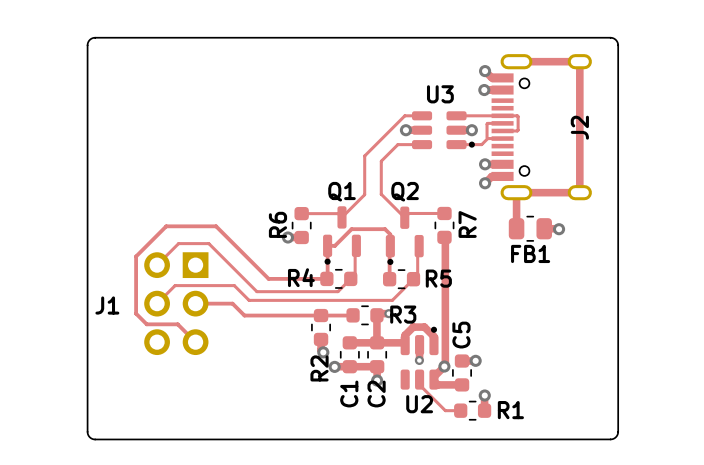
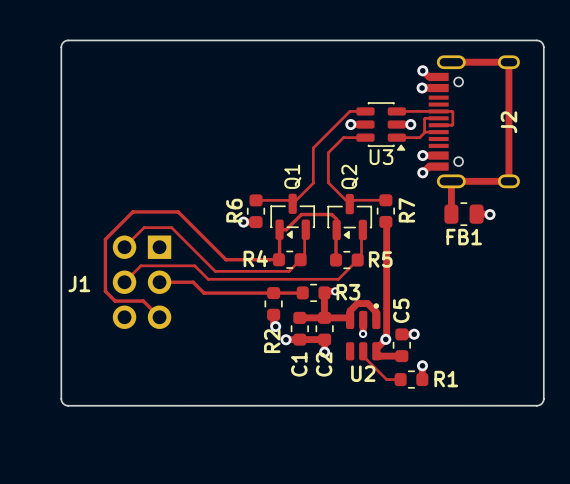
U3 name position: U3 (440, 94) -> U3 (381, 157)
U3 footprint: [412, 111, 475, 150] -> [356, 102, 406, 151]
Q1 footprint: [323, 206, 361, 265] -> [270, 193, 316, 240]
Q2 footprint: [385, 206, 424, 265] -> [327, 193, 373, 241]

